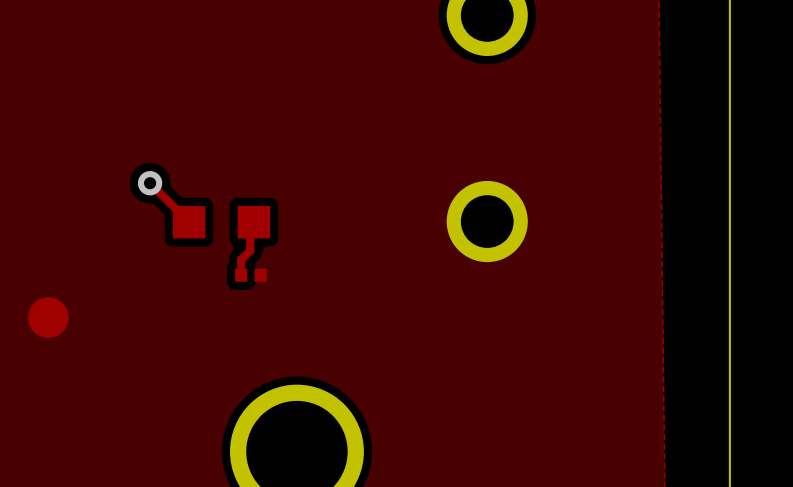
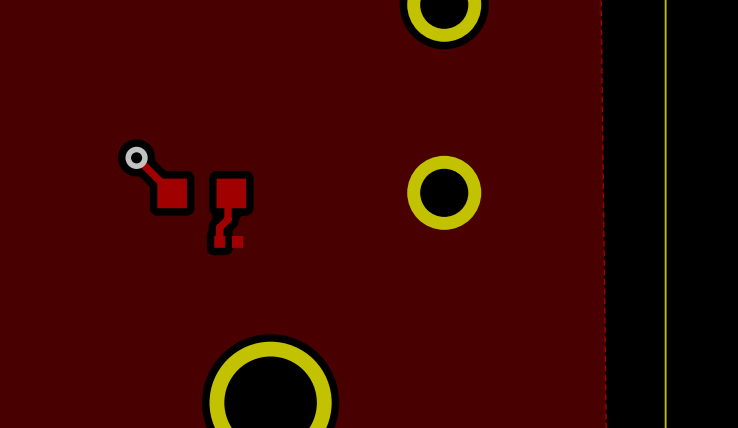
part: (48, 317) -> none

